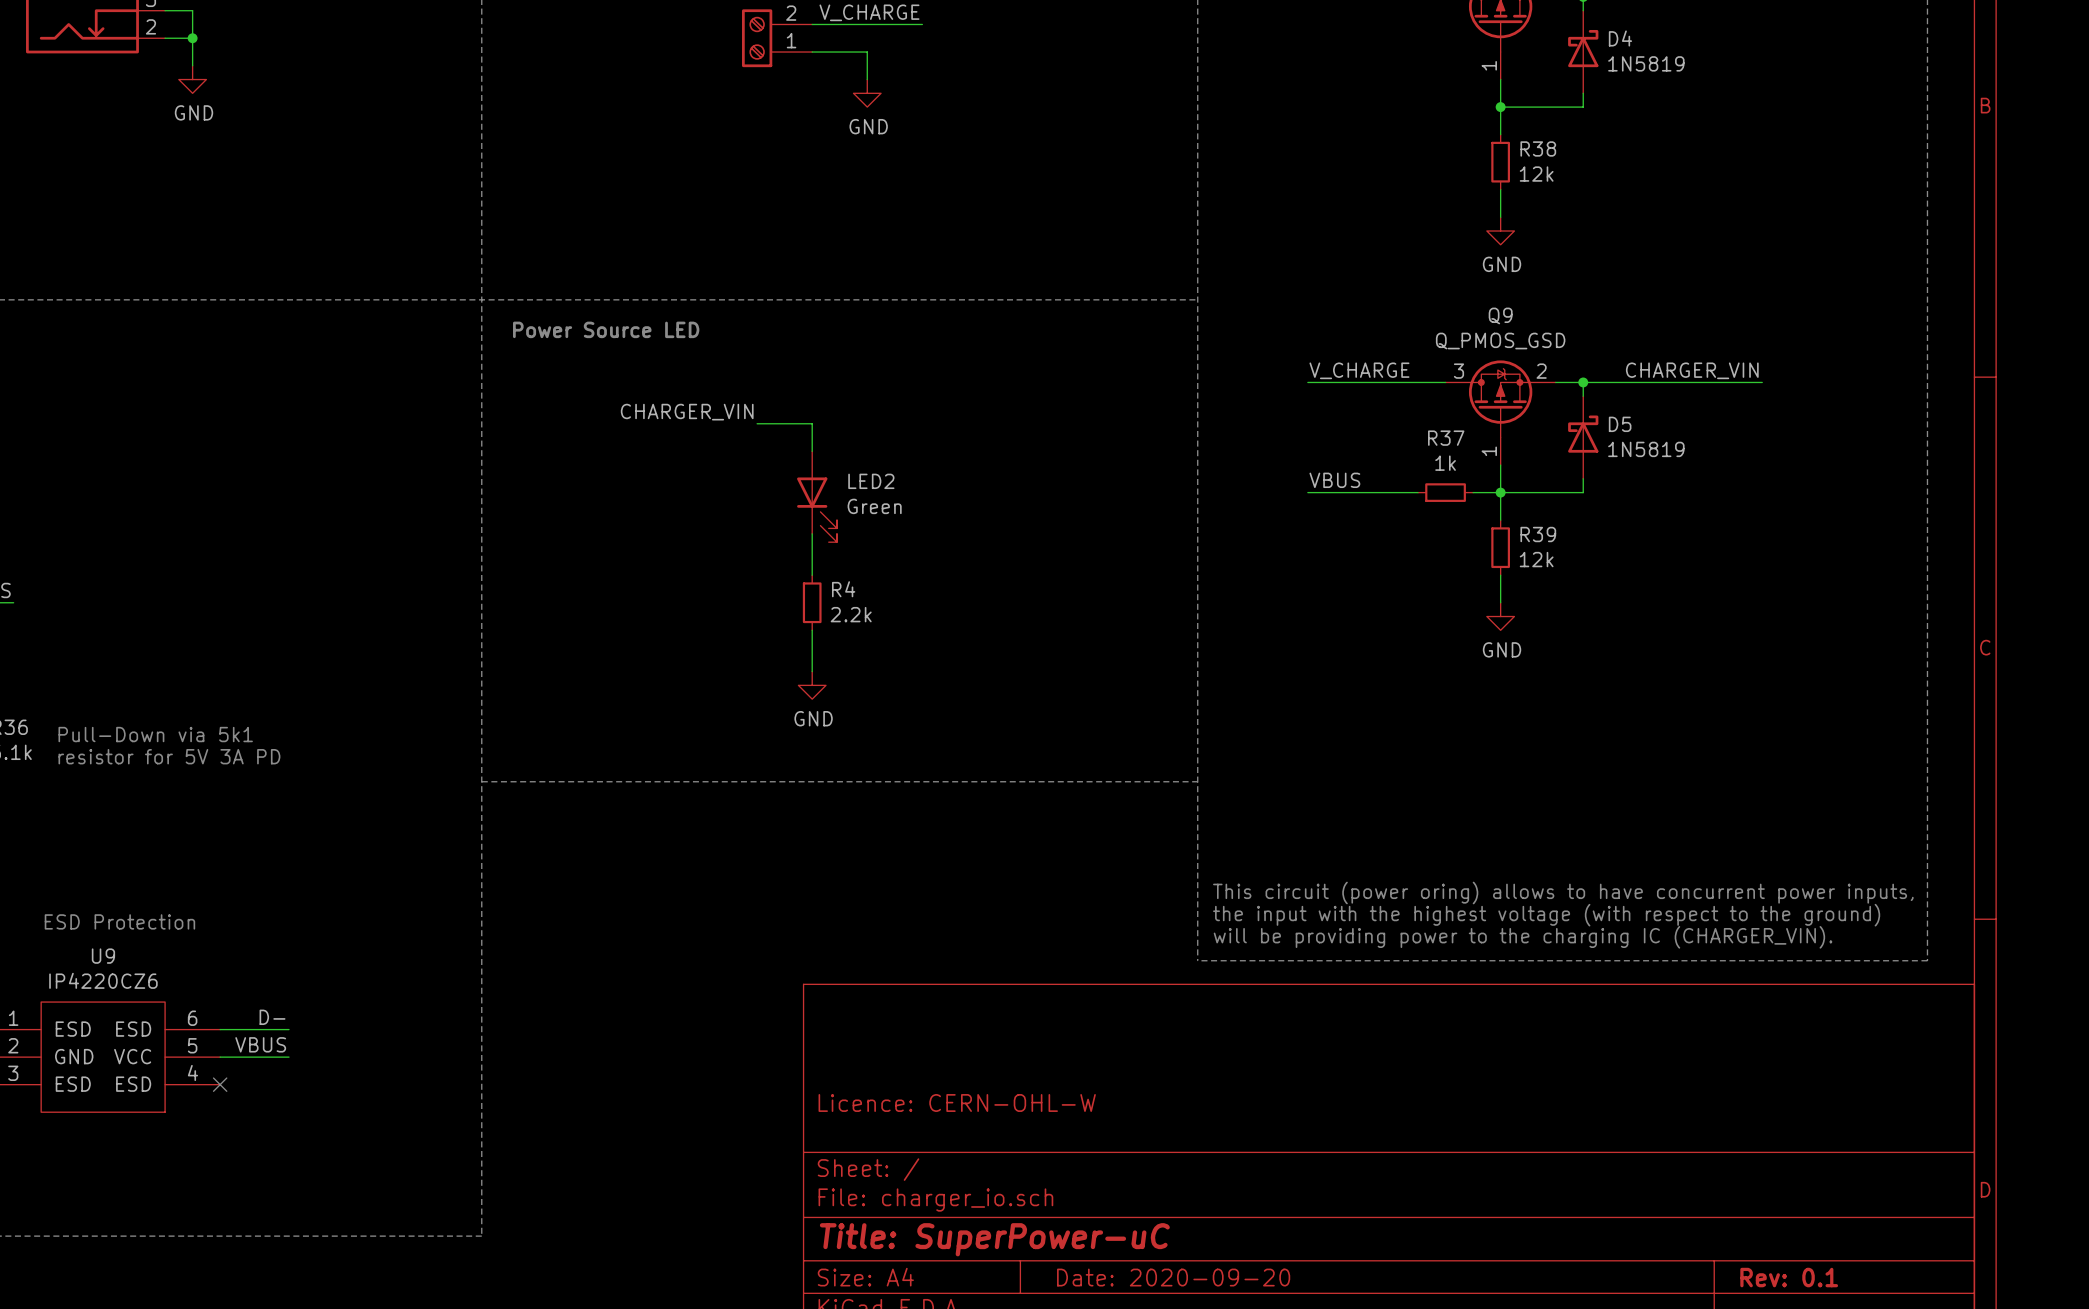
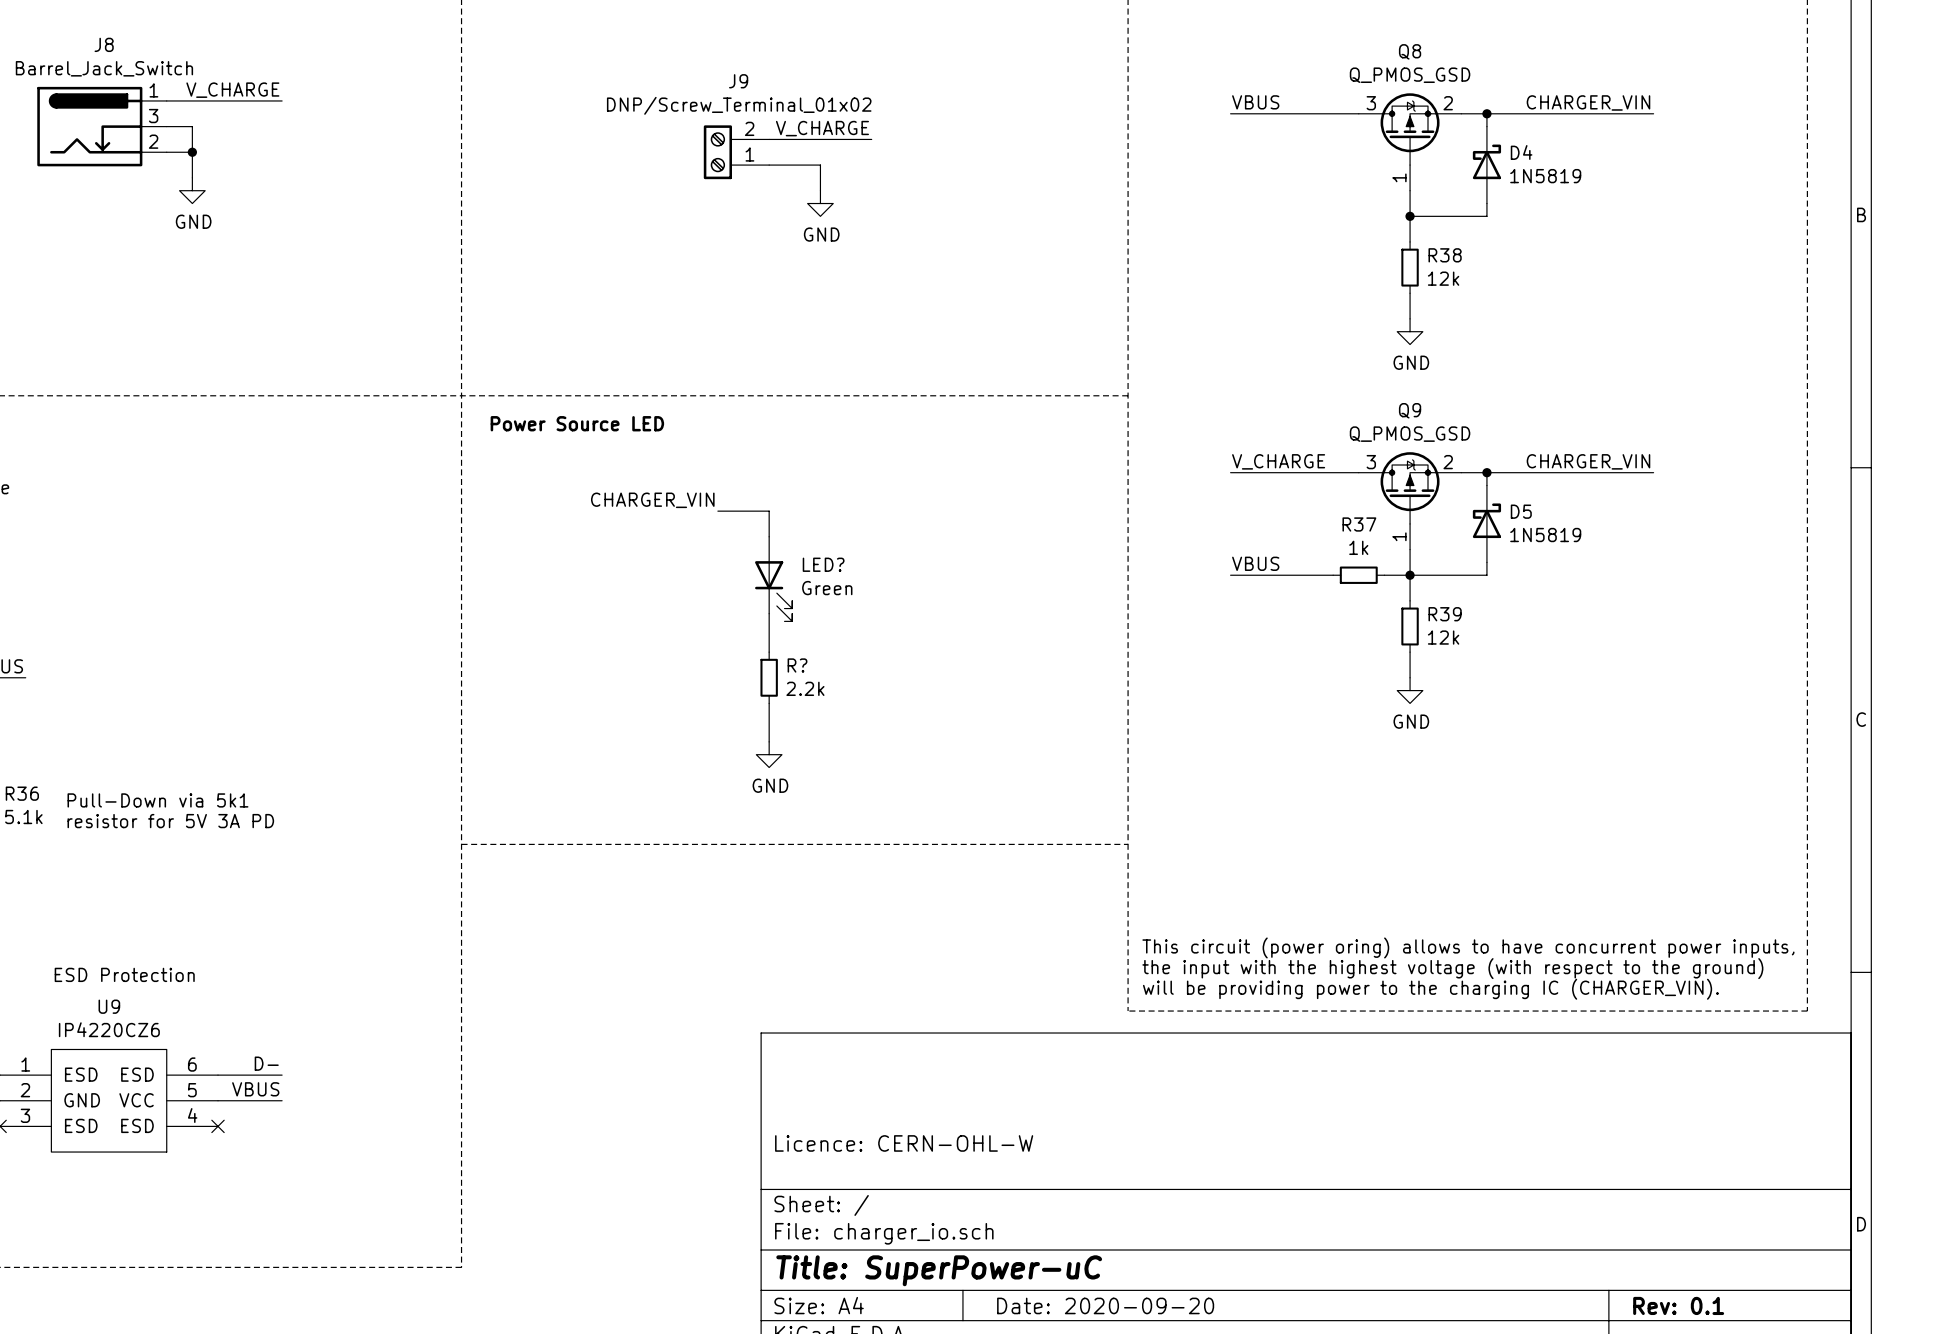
LED2 name: LED2 (871, 481) -> LED? (823, 564)
R4 name: R4 (843, 589) -> R? (797, 665)

